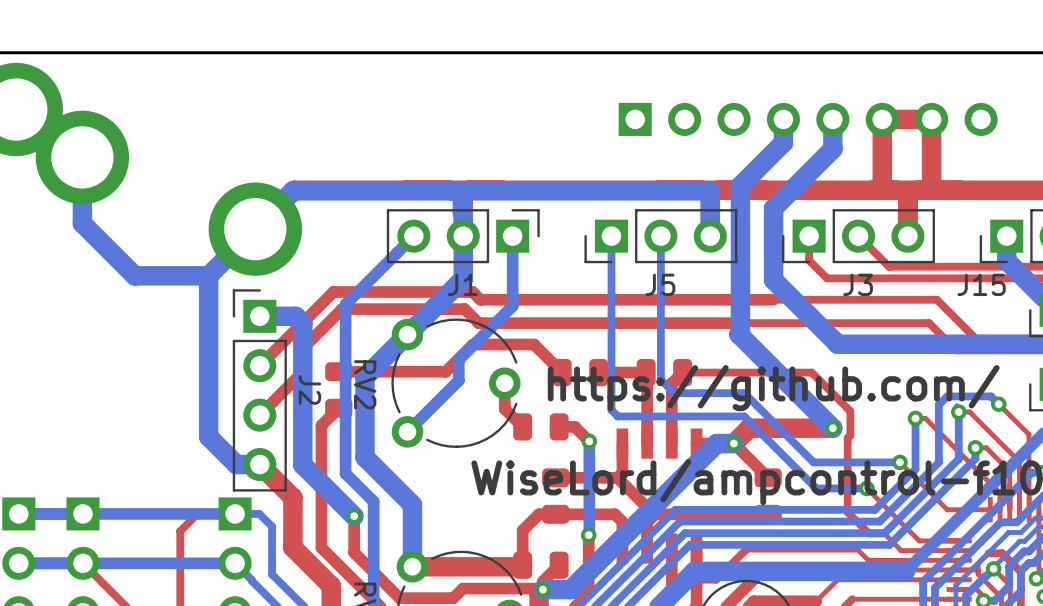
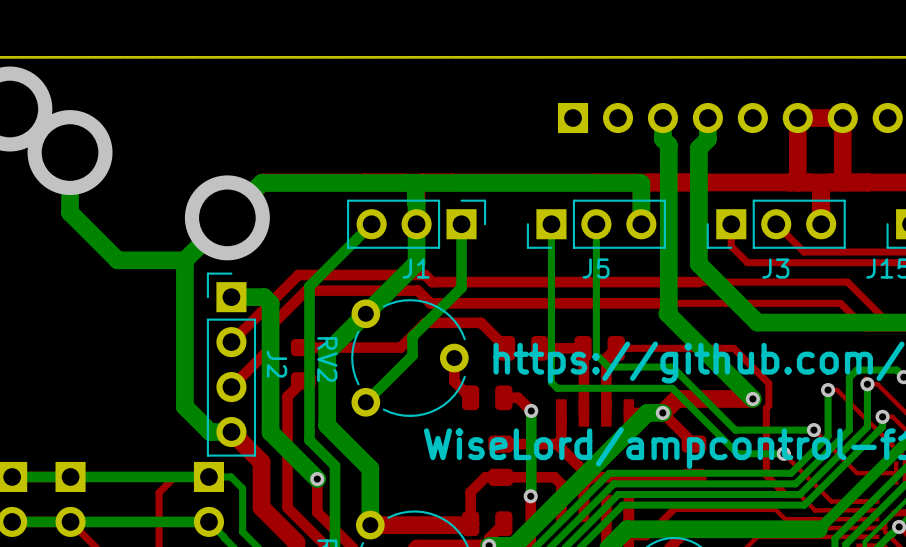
bottom track: none -> (662, 118) (662, 139) (668, 145) (668, 178)
bottom track: (832, 119) (832, 149) (773, 208) -> none
bottom track: (773, 152) (740, 185) -> (698, 148) (698, 198)

